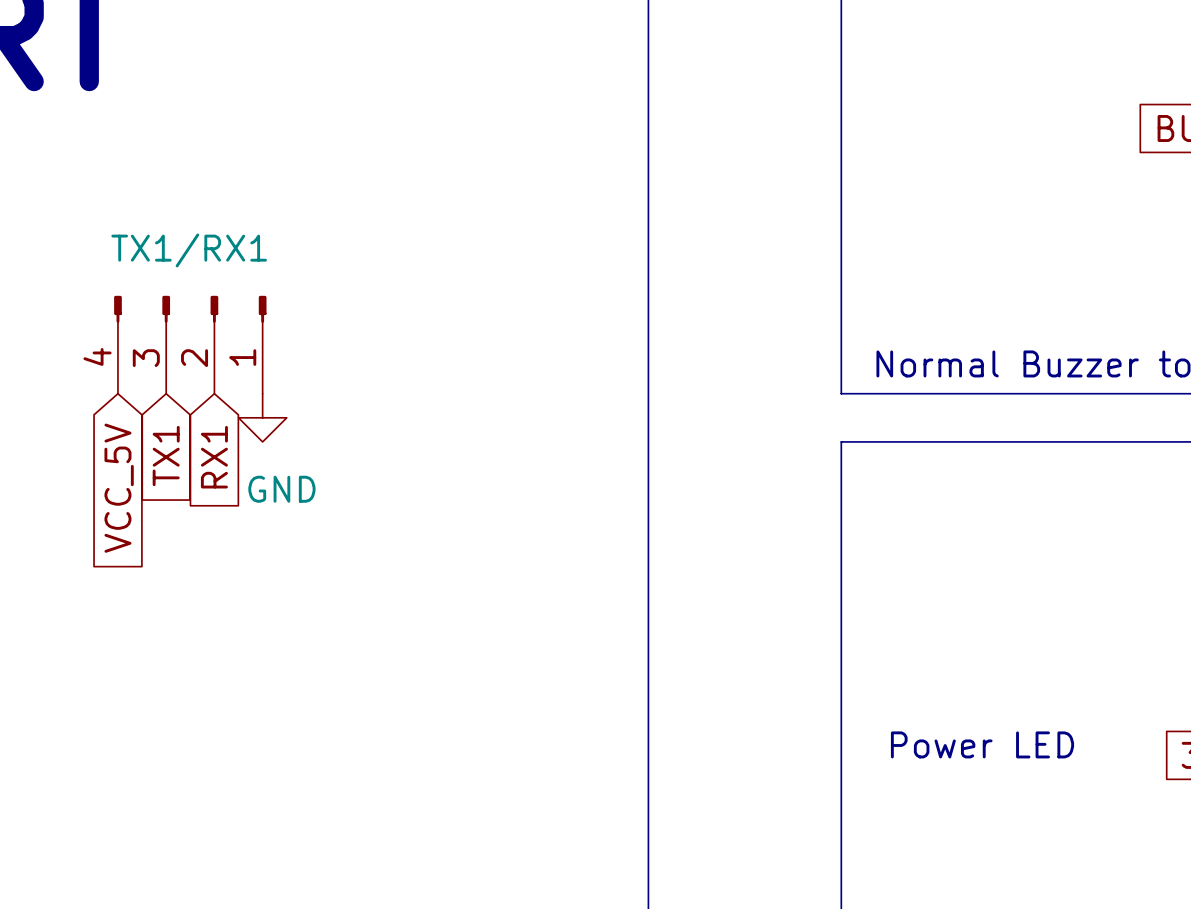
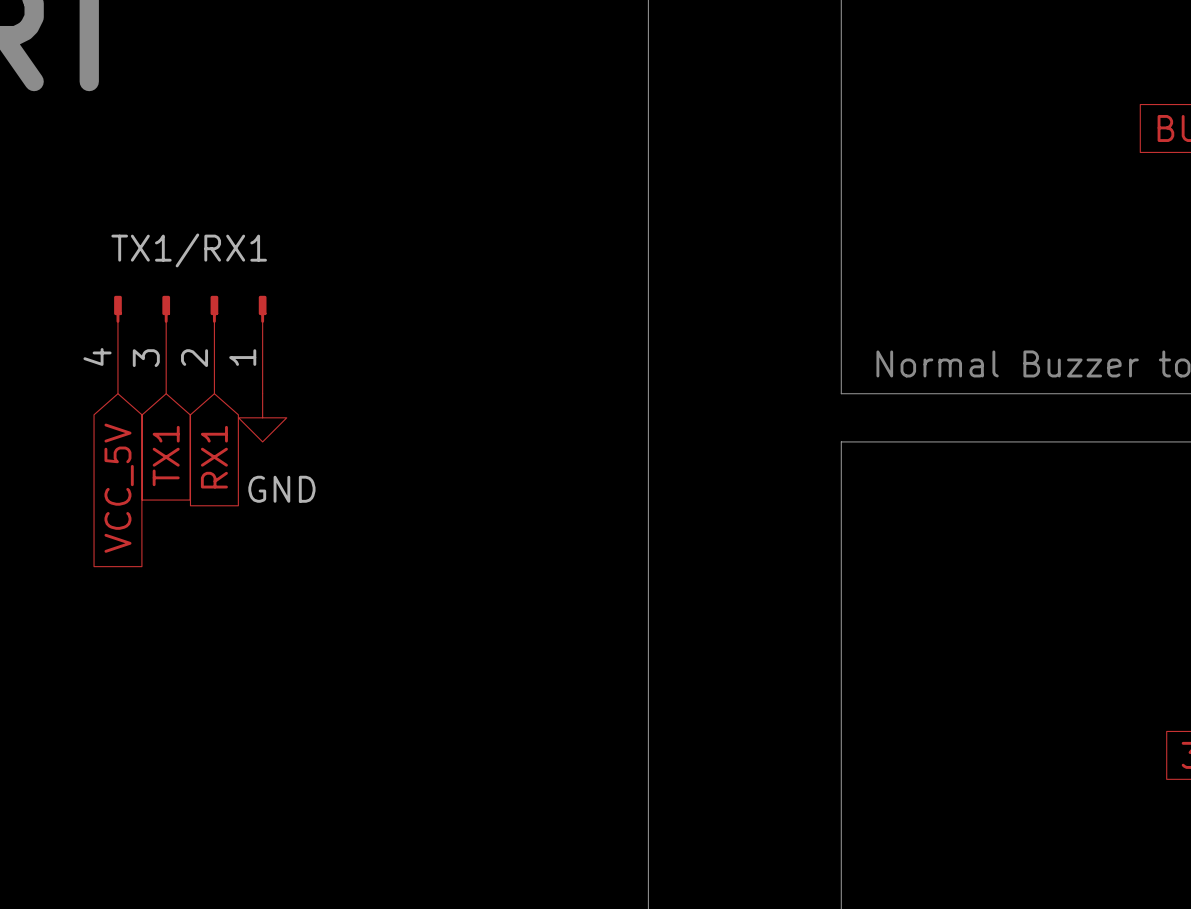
text: Power LED (982, 744) -> none

